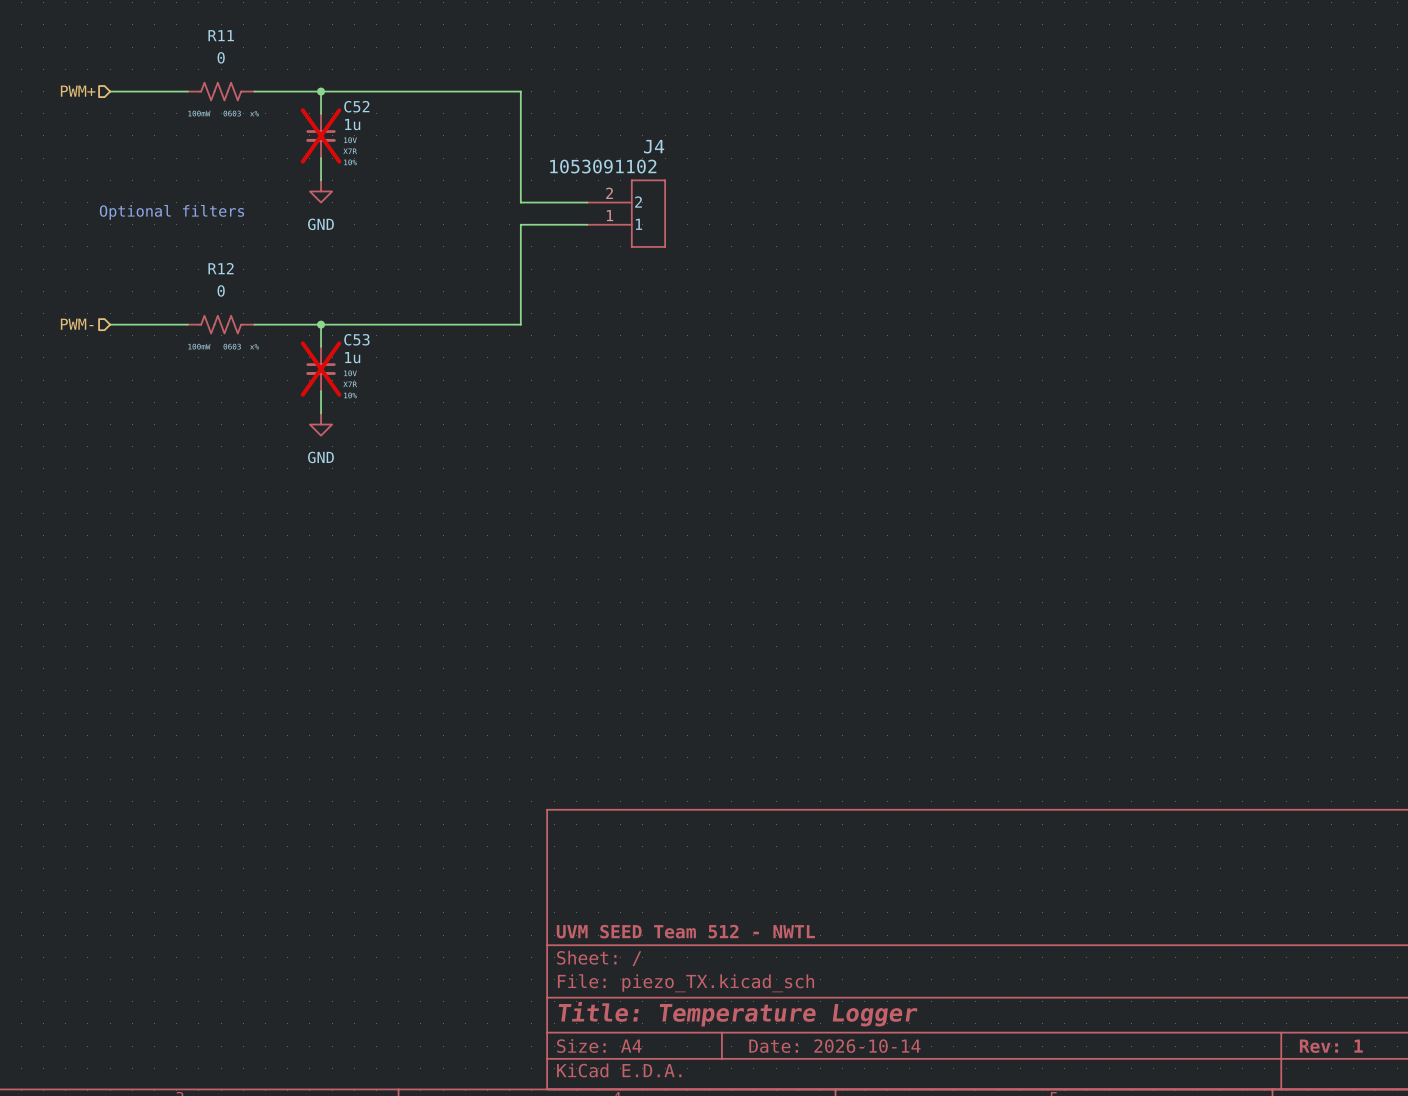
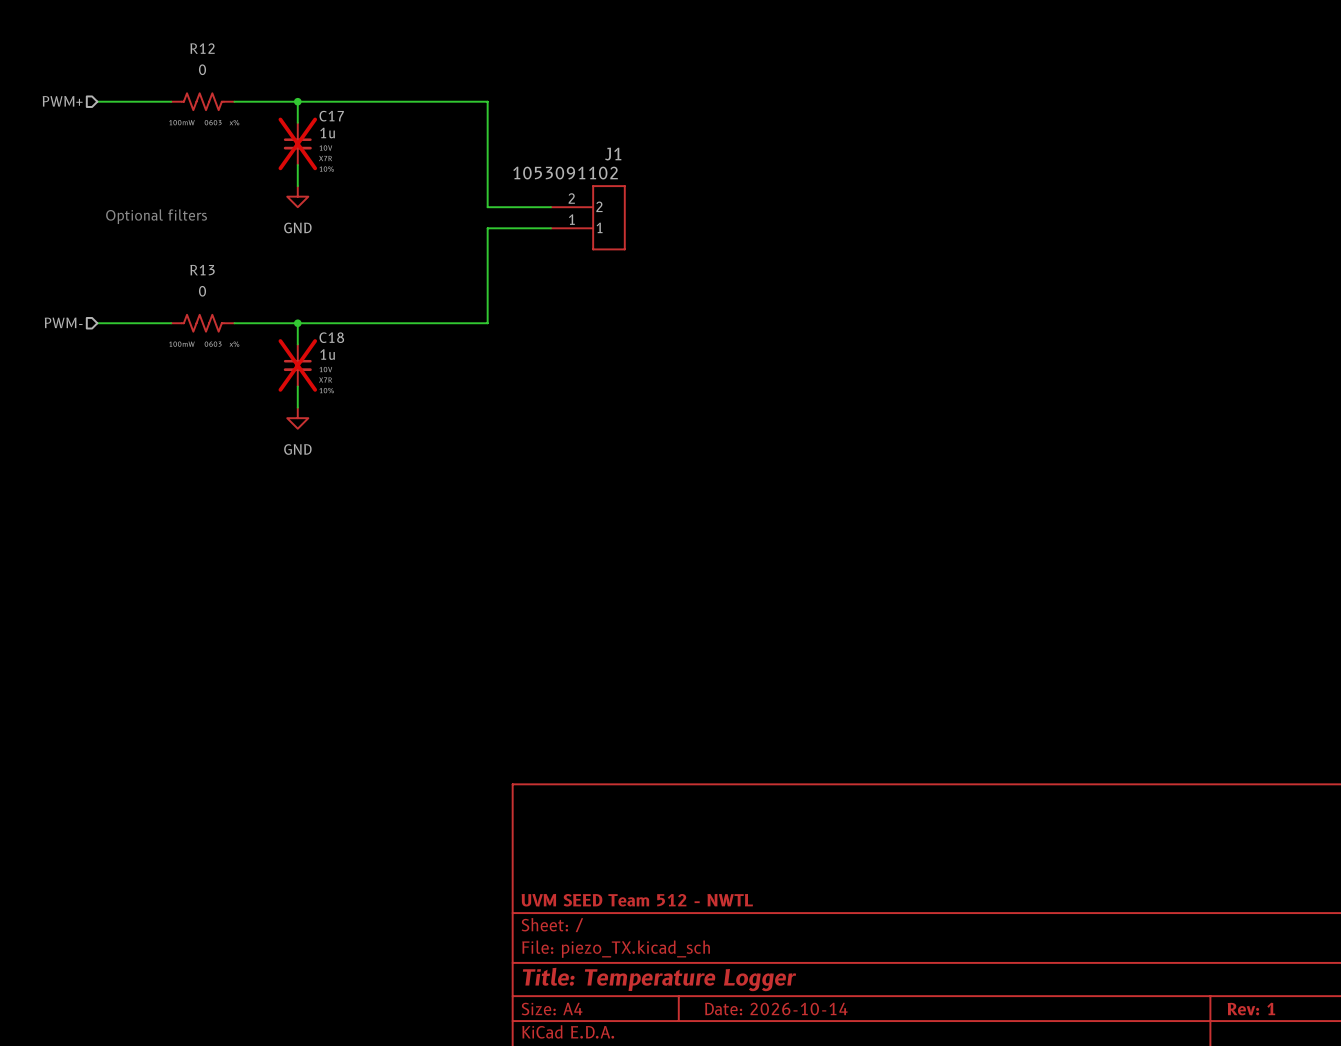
R11 name: R11 (221, 35) -> R12 (202, 48)
C52 name: C52 (356, 106) -> C17 (331, 116)
J4 name: J4 (654, 146) -> J1 (613, 154)
R12 name: R12 (221, 268) -> R13 (202, 270)
C53 name: C53 (356, 339) -> C18 (331, 337)

